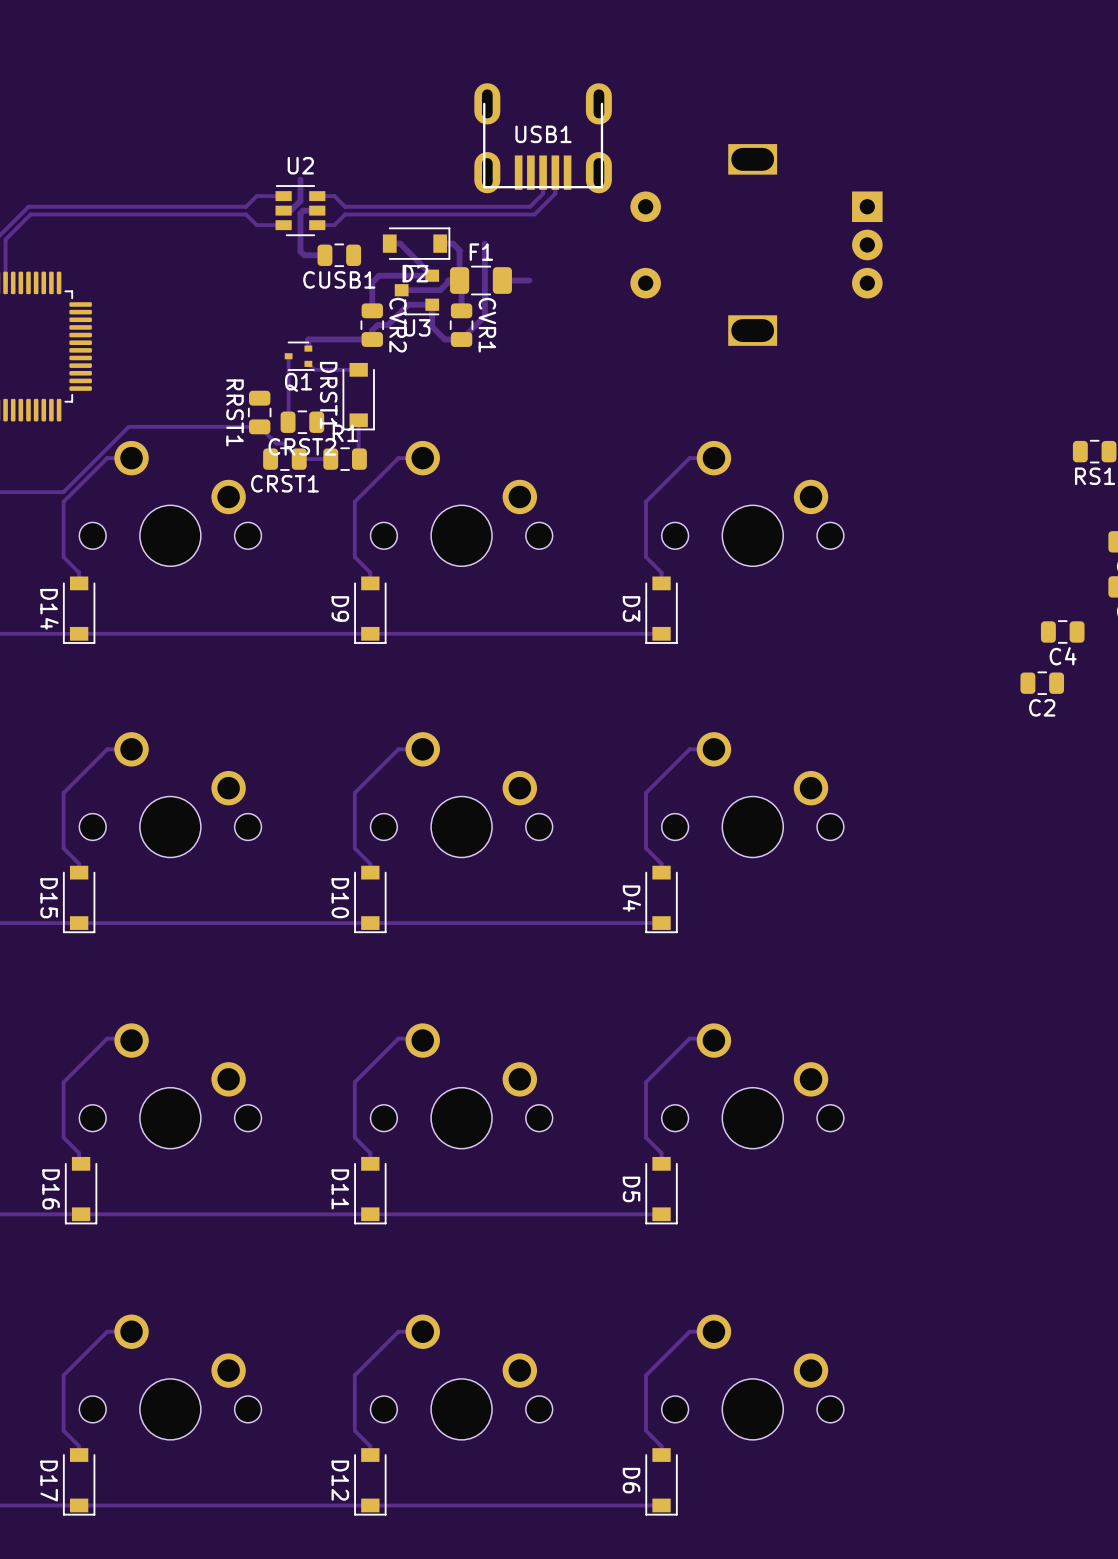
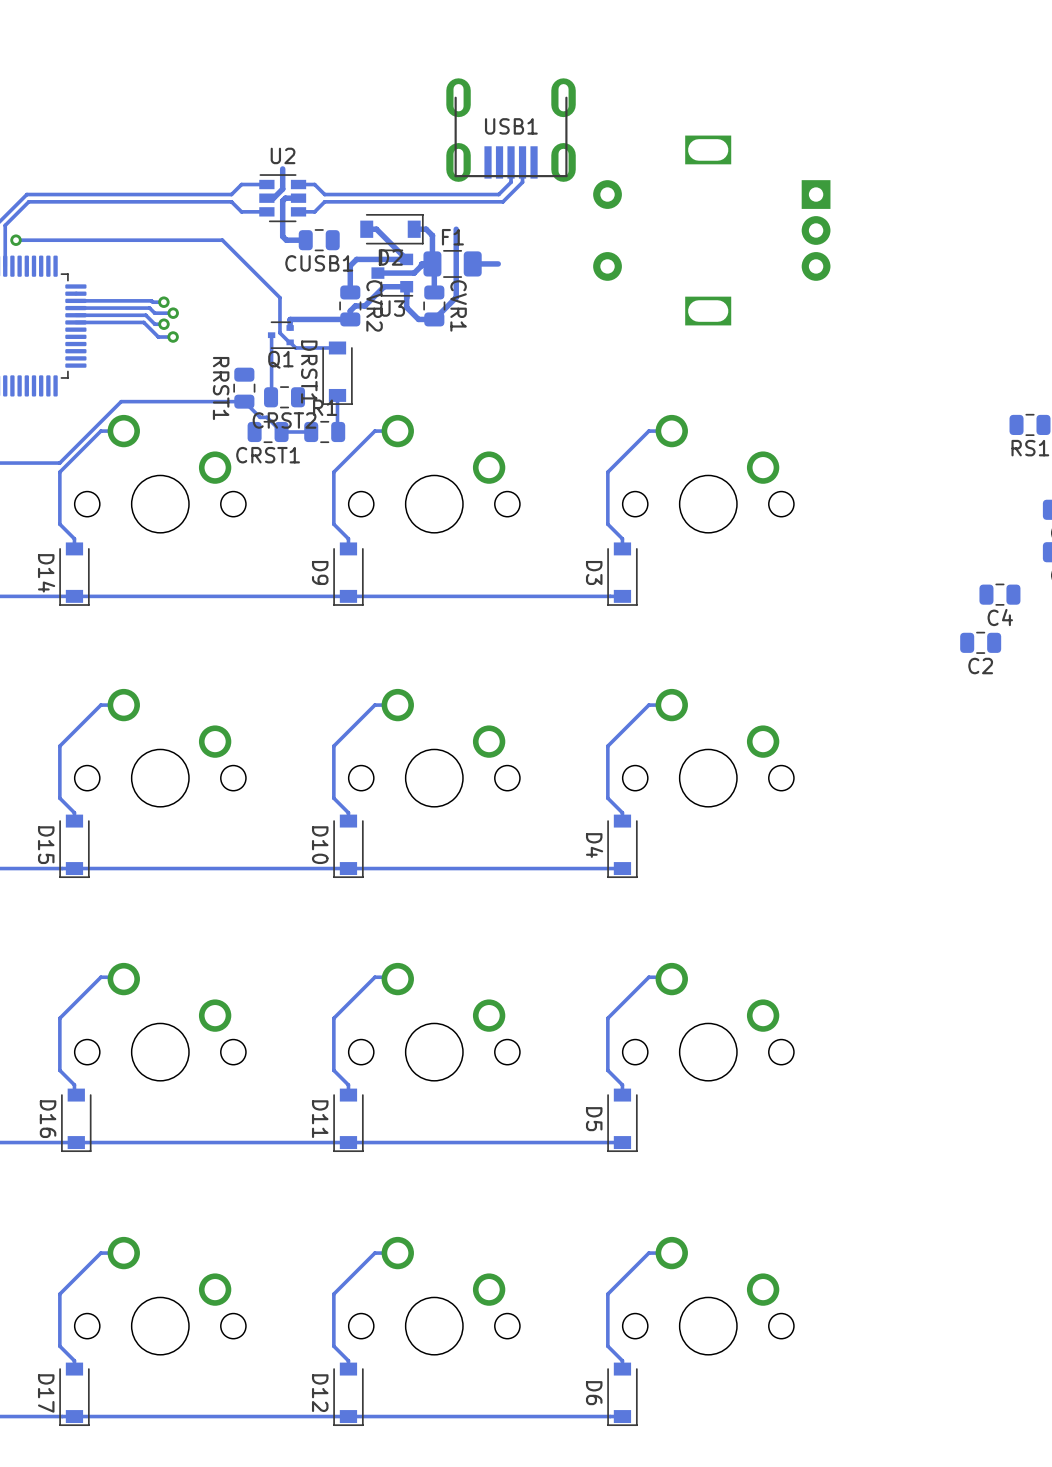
track: none -> (16, 240) (222, 240) (279, 297) (279, 332) (290, 342)
via: none -> (16, 240)
track: none -> (75, 300) (163, 302)
via: none -> (163, 302)
track: none -> (75, 308) (149, 308) (154, 313) (173, 313)
via: none -> (173, 313)
track: none -> (75, 315) (145, 315) (154, 324) (163, 324)
track: none -> (75, 322) (143, 322) (158, 337) (173, 337)
via: none -> (163, 324)
via: none -> (173, 337)

